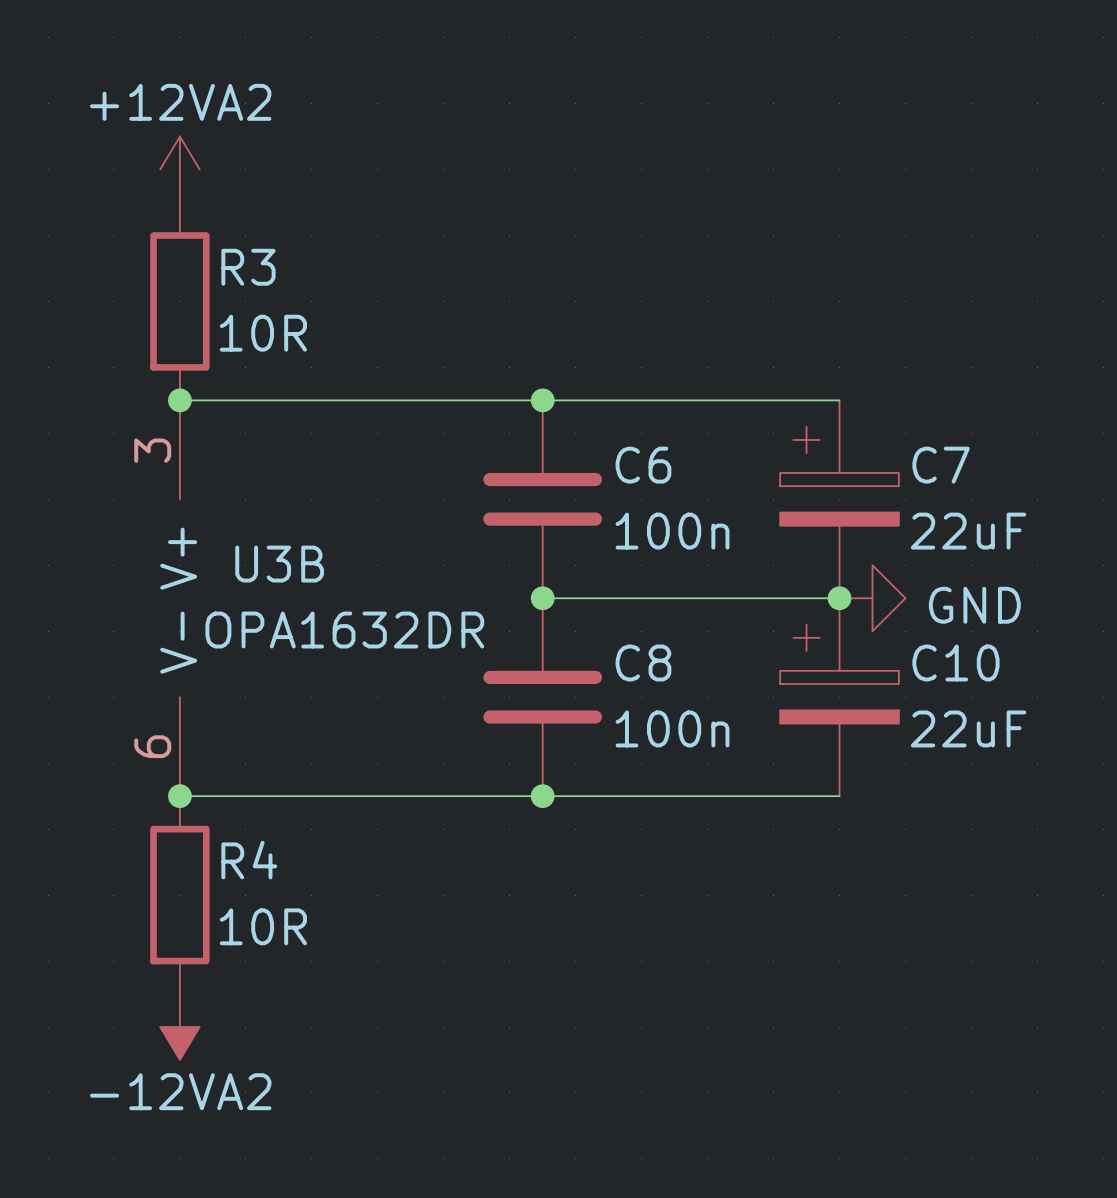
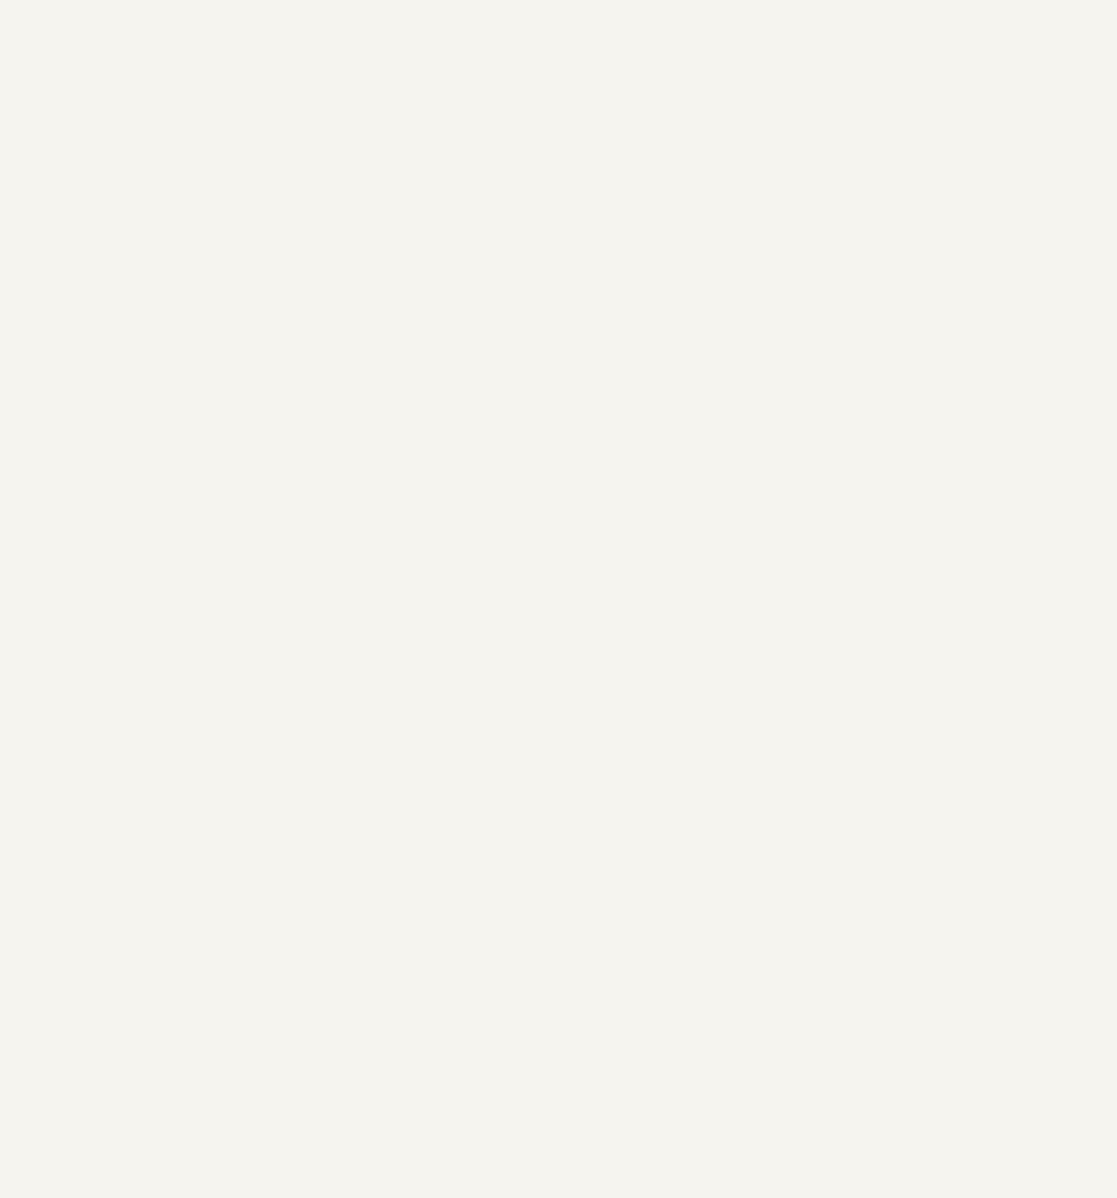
power symbol: +12VA2 (179, 169) -> none
R3: 10R (179, 301) -> none
wire: (179, 400) (839, 400) -> none
junction: (179, 400) -> none
junction: (542, 400) -> none
C6: 100n (542, 499) -> none
C7: 22uF (839, 499) -> none
U3B: OPA1632DR (179, 598) -> none
wire: (542, 598) (839, 598) -> none
junction: (542, 598) -> none
junction: (839, 598) -> none
power symbol: GND (872, 598) -> none
C8: 100n (542, 697) -> none
C10: 22uF (839, 697) -> none
wire: (179, 796) (839, 796) -> none
junction: (179, 796) -> none
junction: (542, 796) -> none
R4: 10R (179, 895) -> none
power symbol: -12VA2 (179, 1027) -> none

